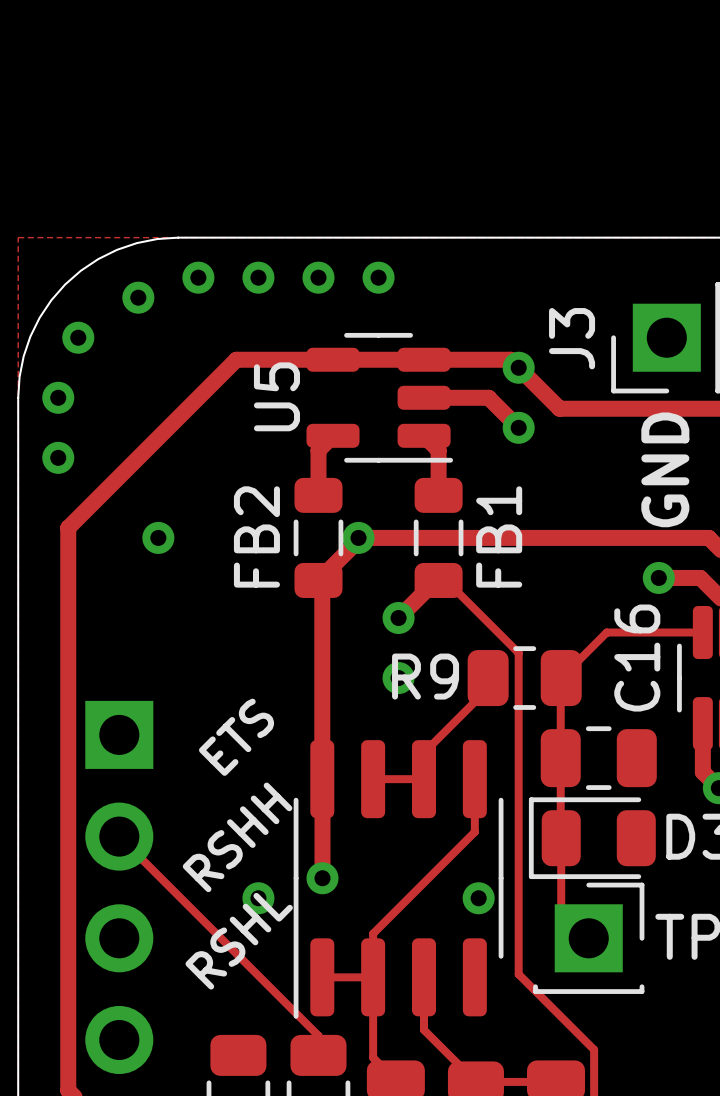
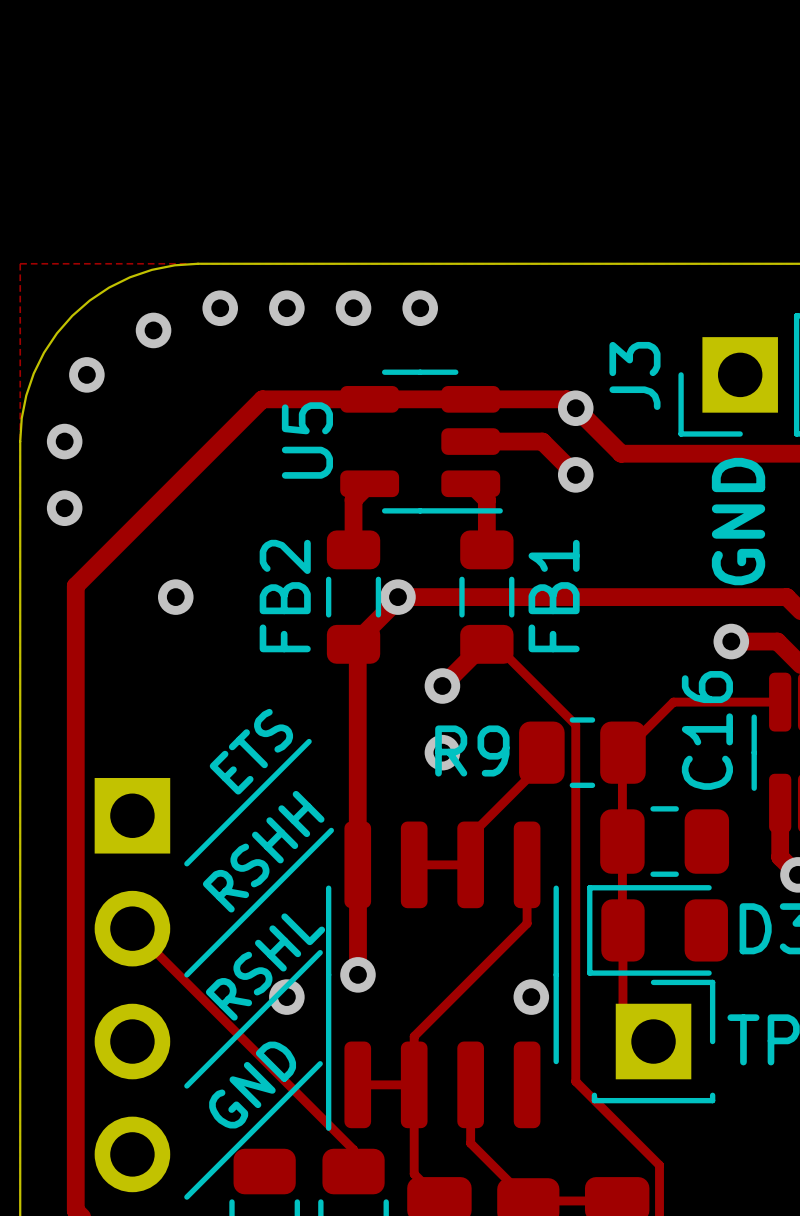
line: none -> (309, 741) (186, 863)
text: none -> ETS (251, 751)
text: ETS (236, 737) -> RSHH (263, 851)
line: none -> (331, 830) (186, 974)
text: RSHH (237, 837) -> RSHL (265, 967)
line: none -> (320, 952) (186, 1085)
text: RSHL (239, 941) -> none
line: none -> (320, 1063) (186, 1197)
text: none -> GND (252, 1085)

